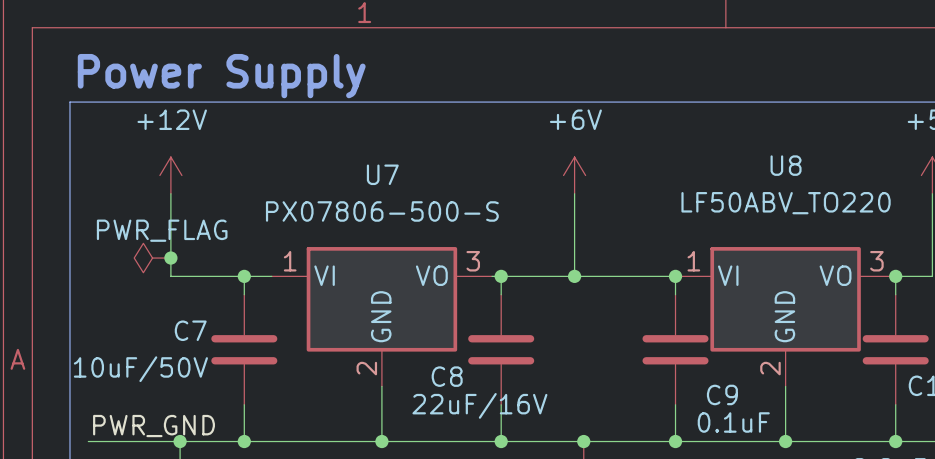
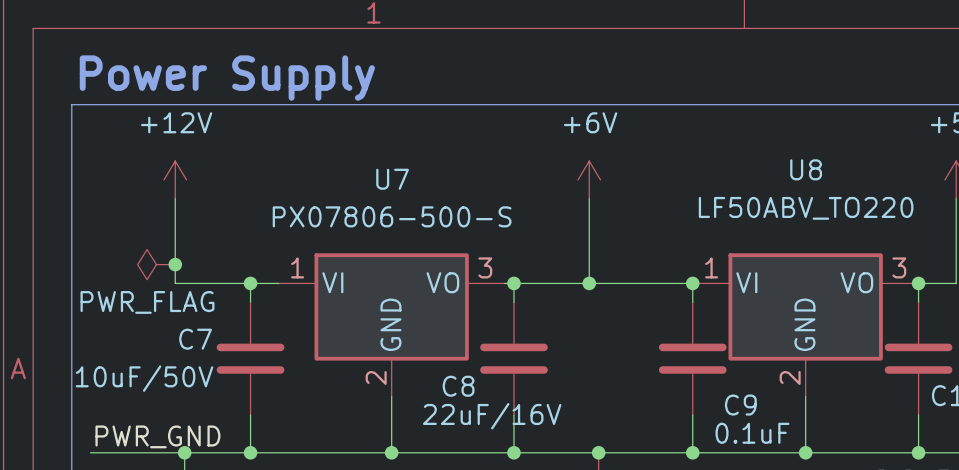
power symbol text position: PWR_FLAG (162, 230) -> PWR_FLAG (147, 302)

